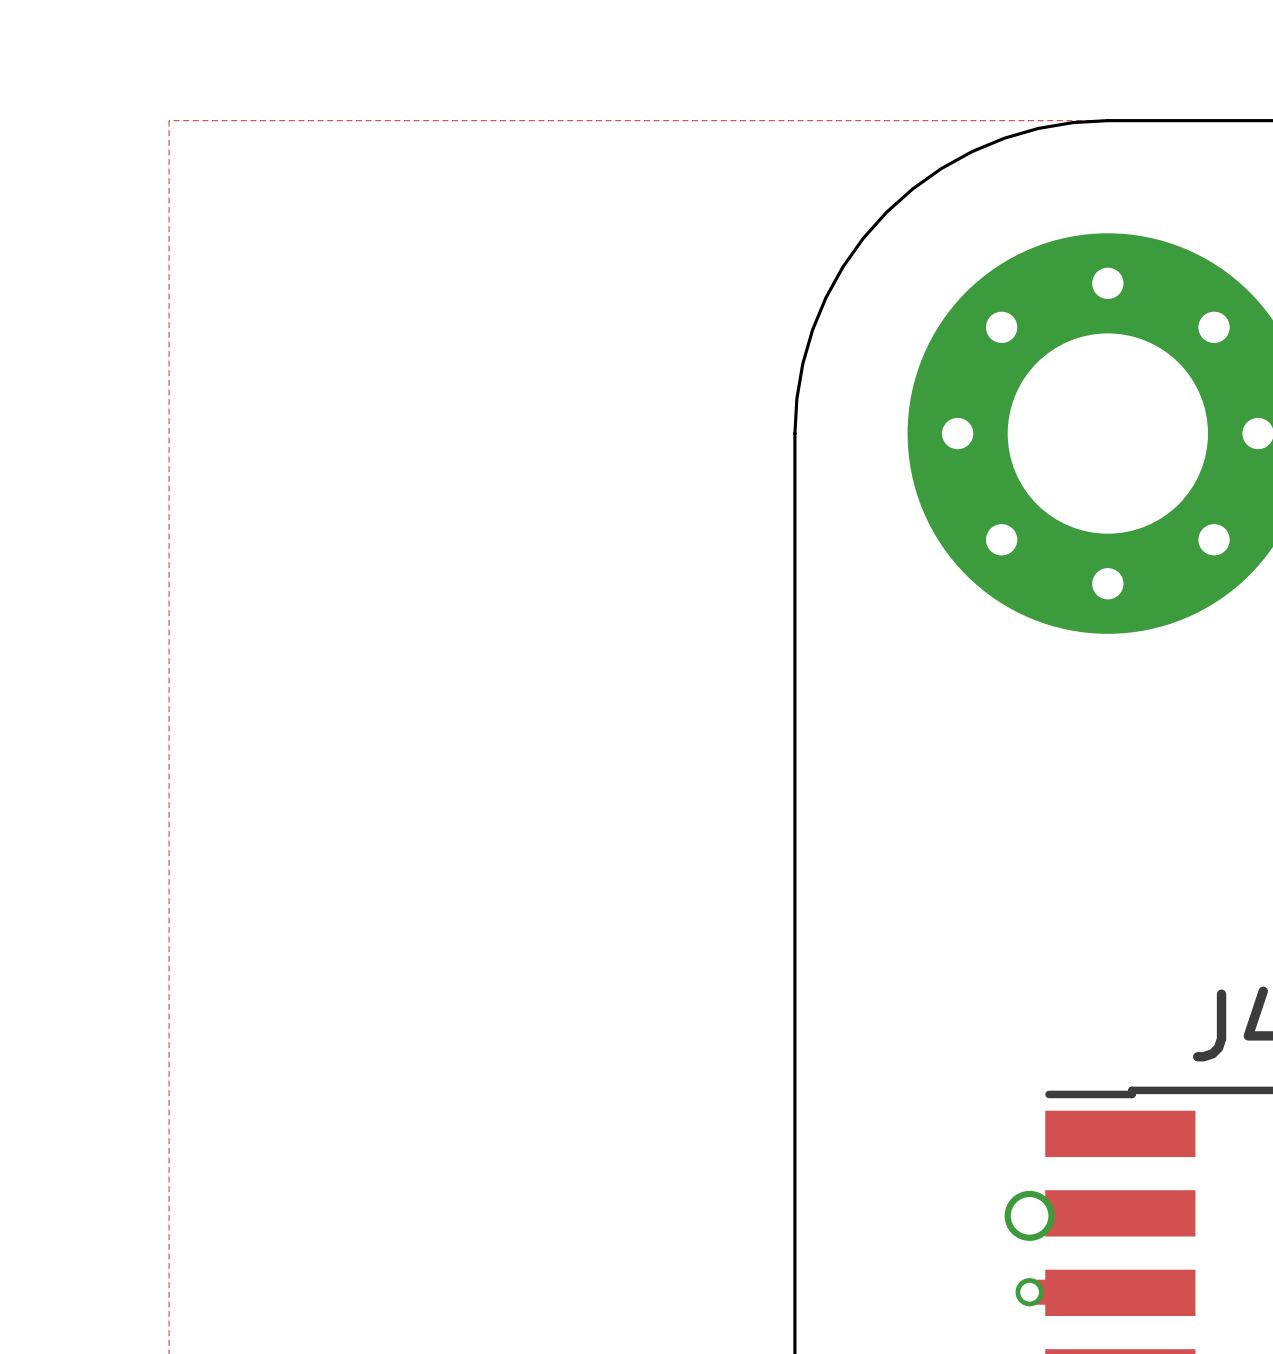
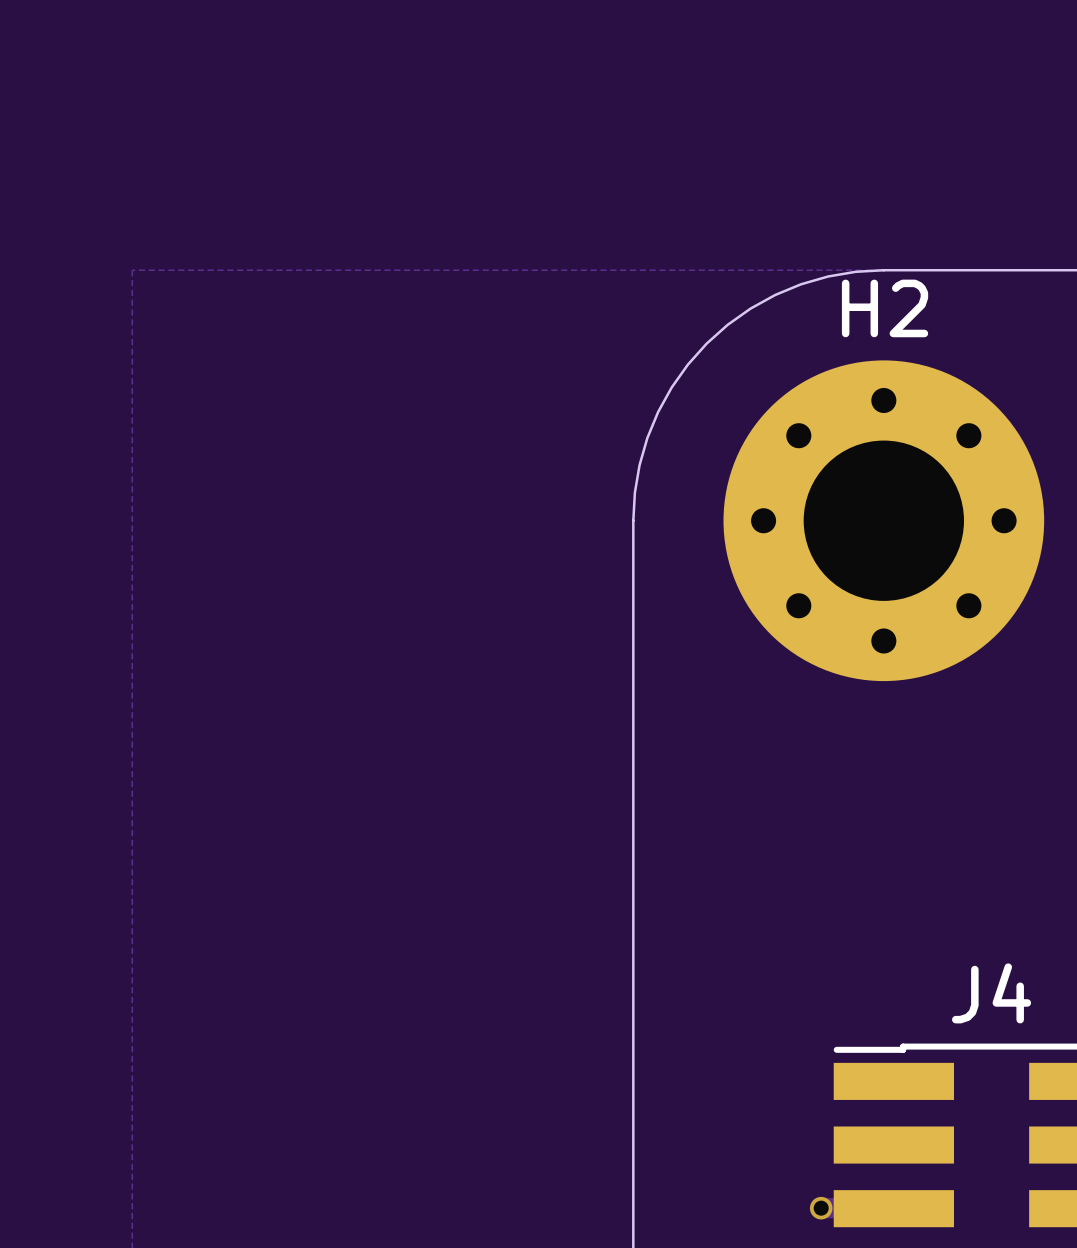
H2 name: none -> H2 (885, 308)
via: (1029, 1215) -> none

